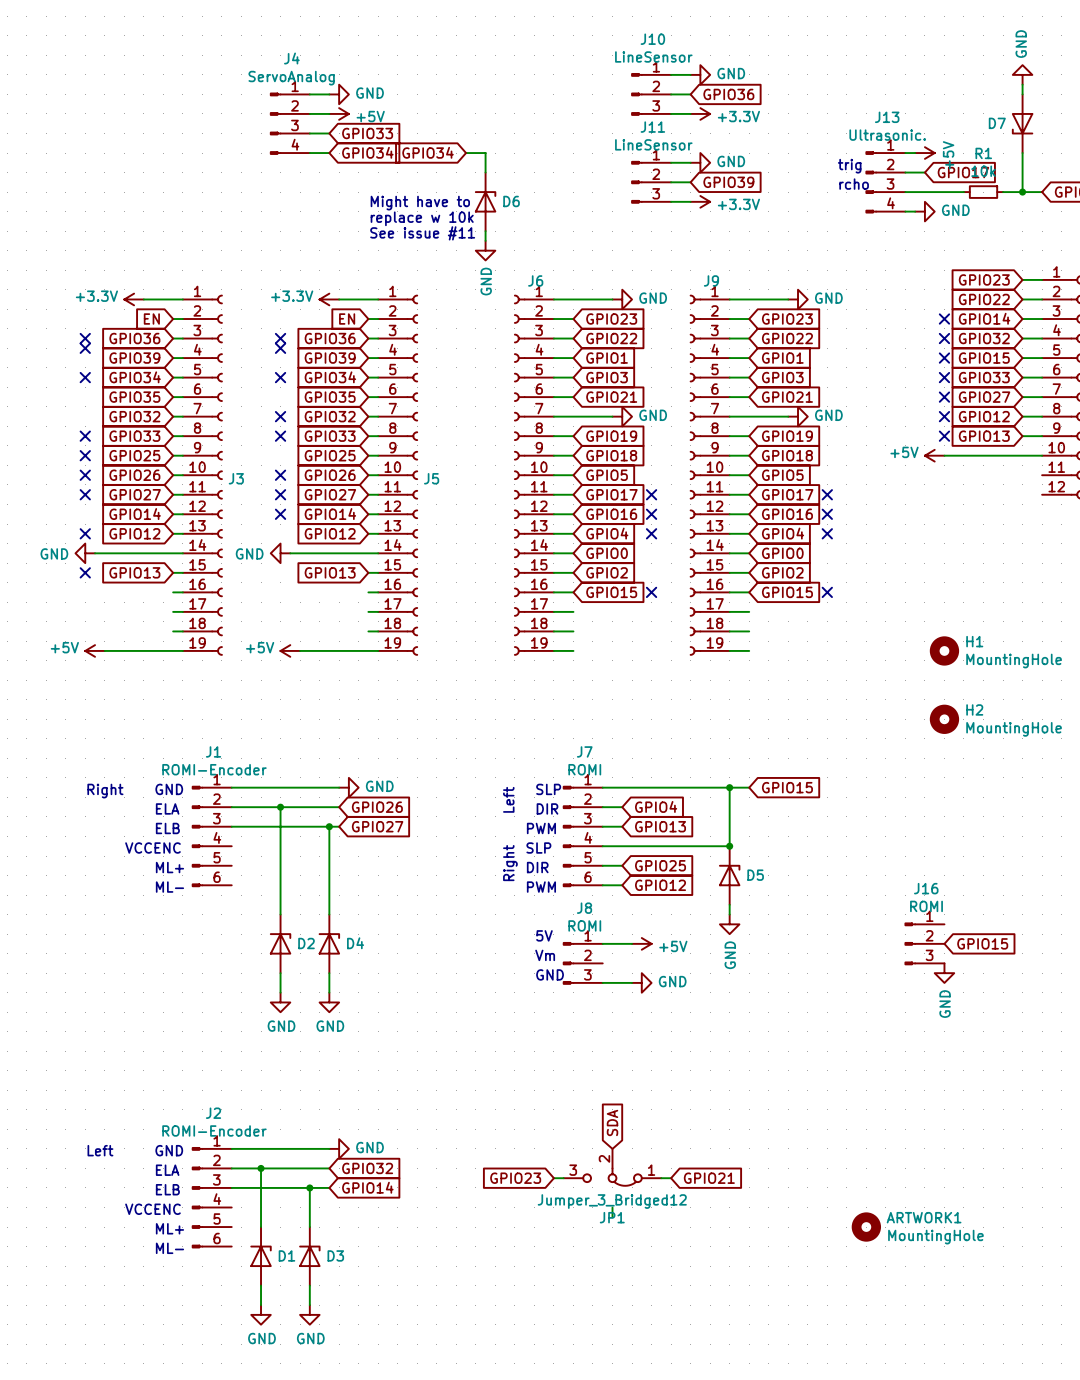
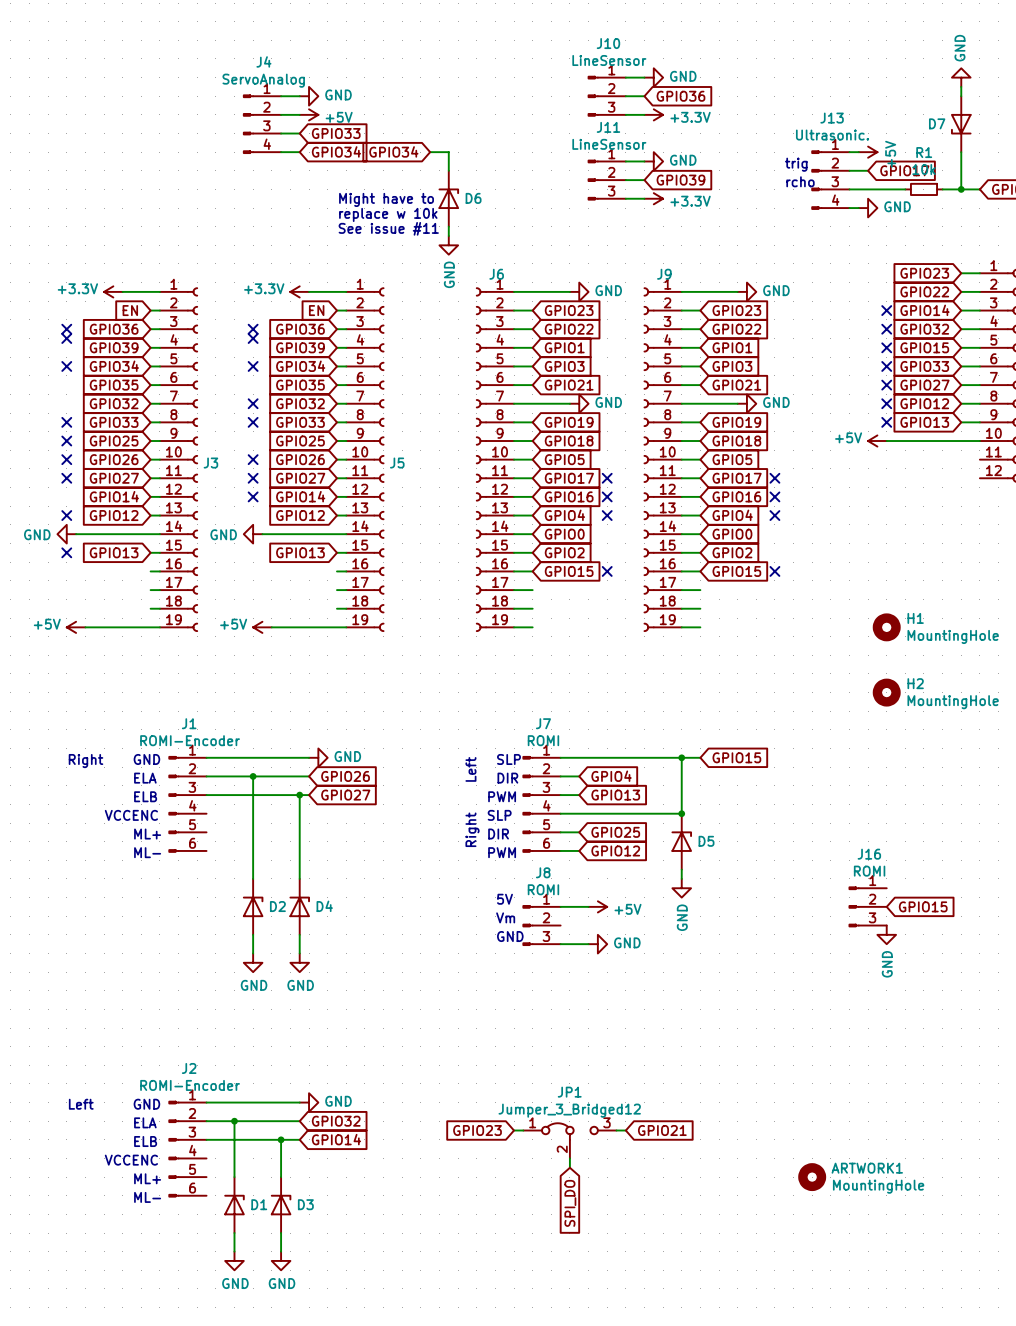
global label: SDA (612, 1122) -> none
JP1 rotation: 0° (612, 1177) -> 180° (569, 1131)
global label: none -> SPI_DO (570, 1203)

